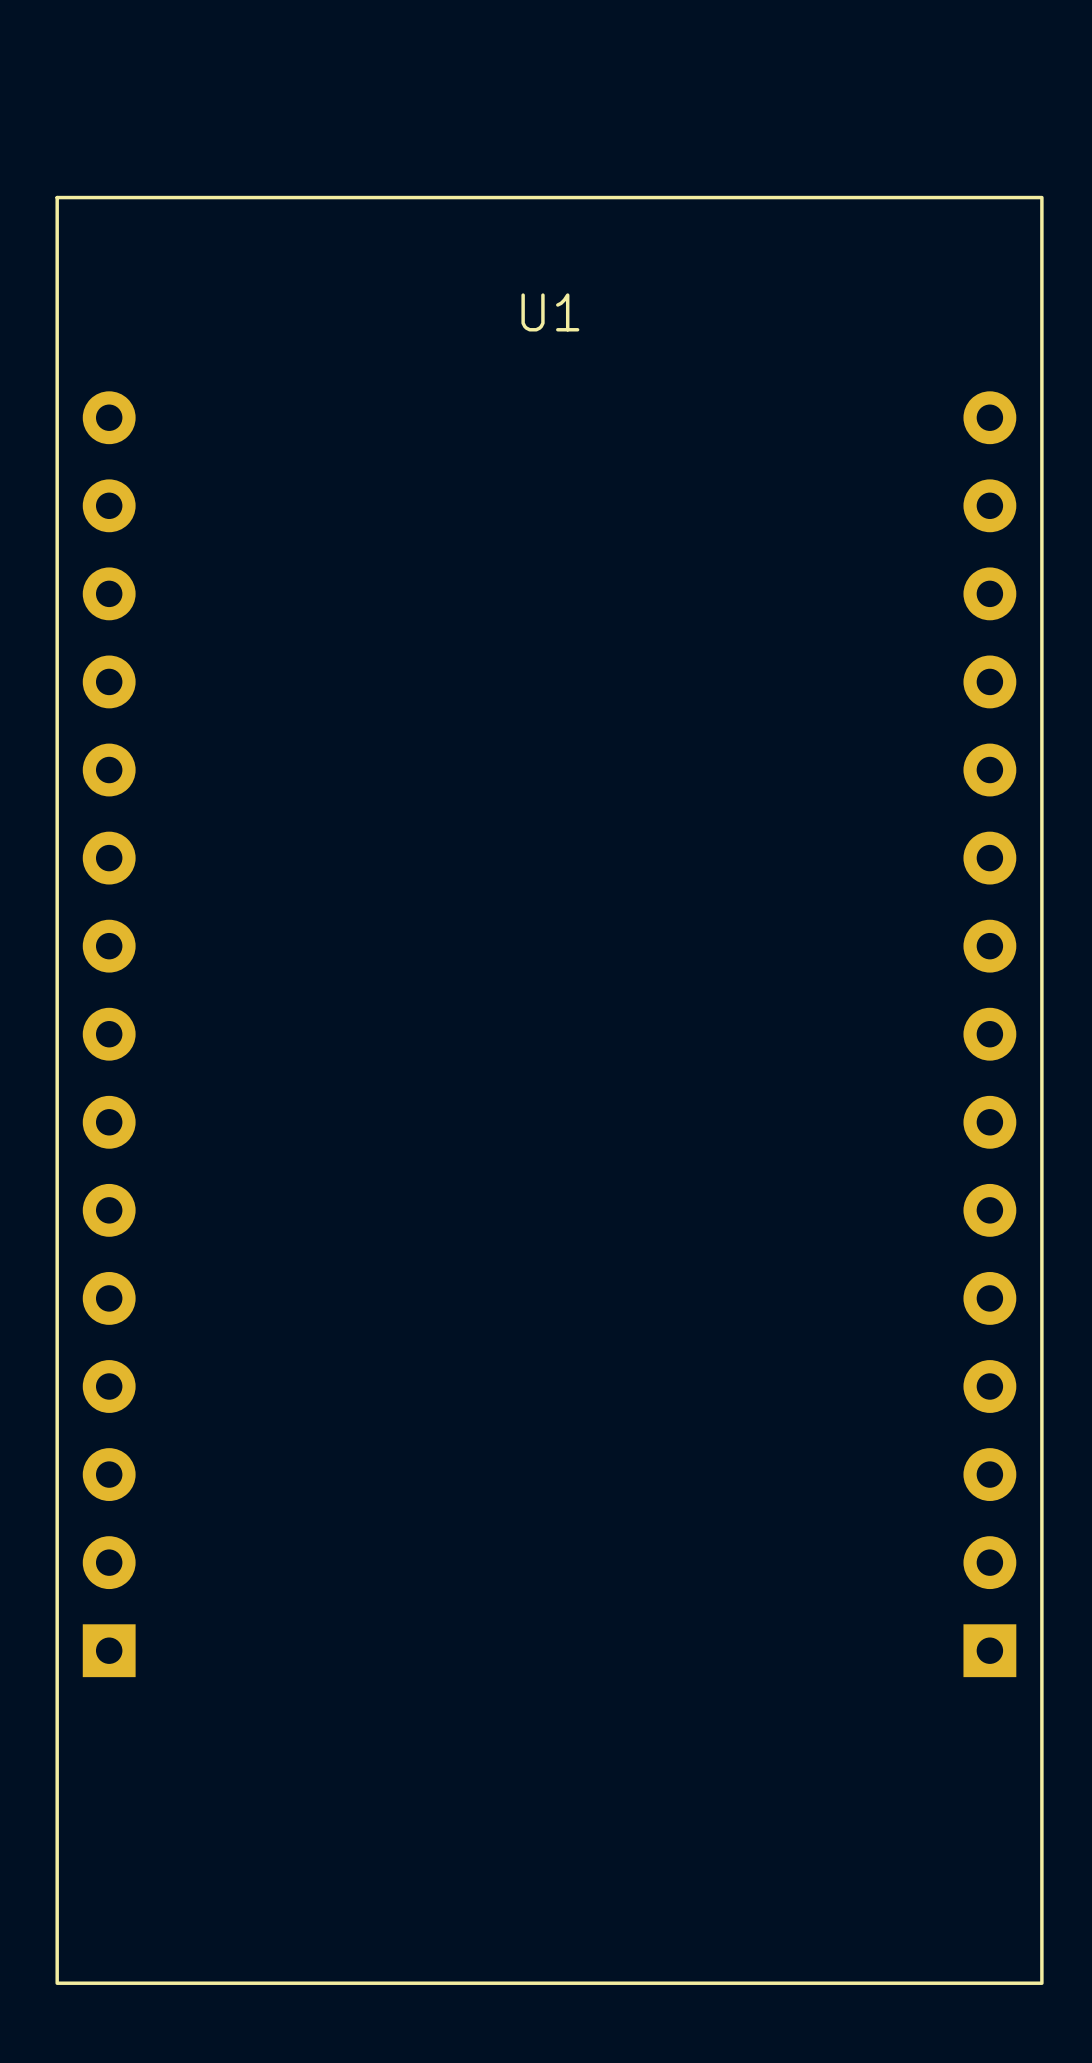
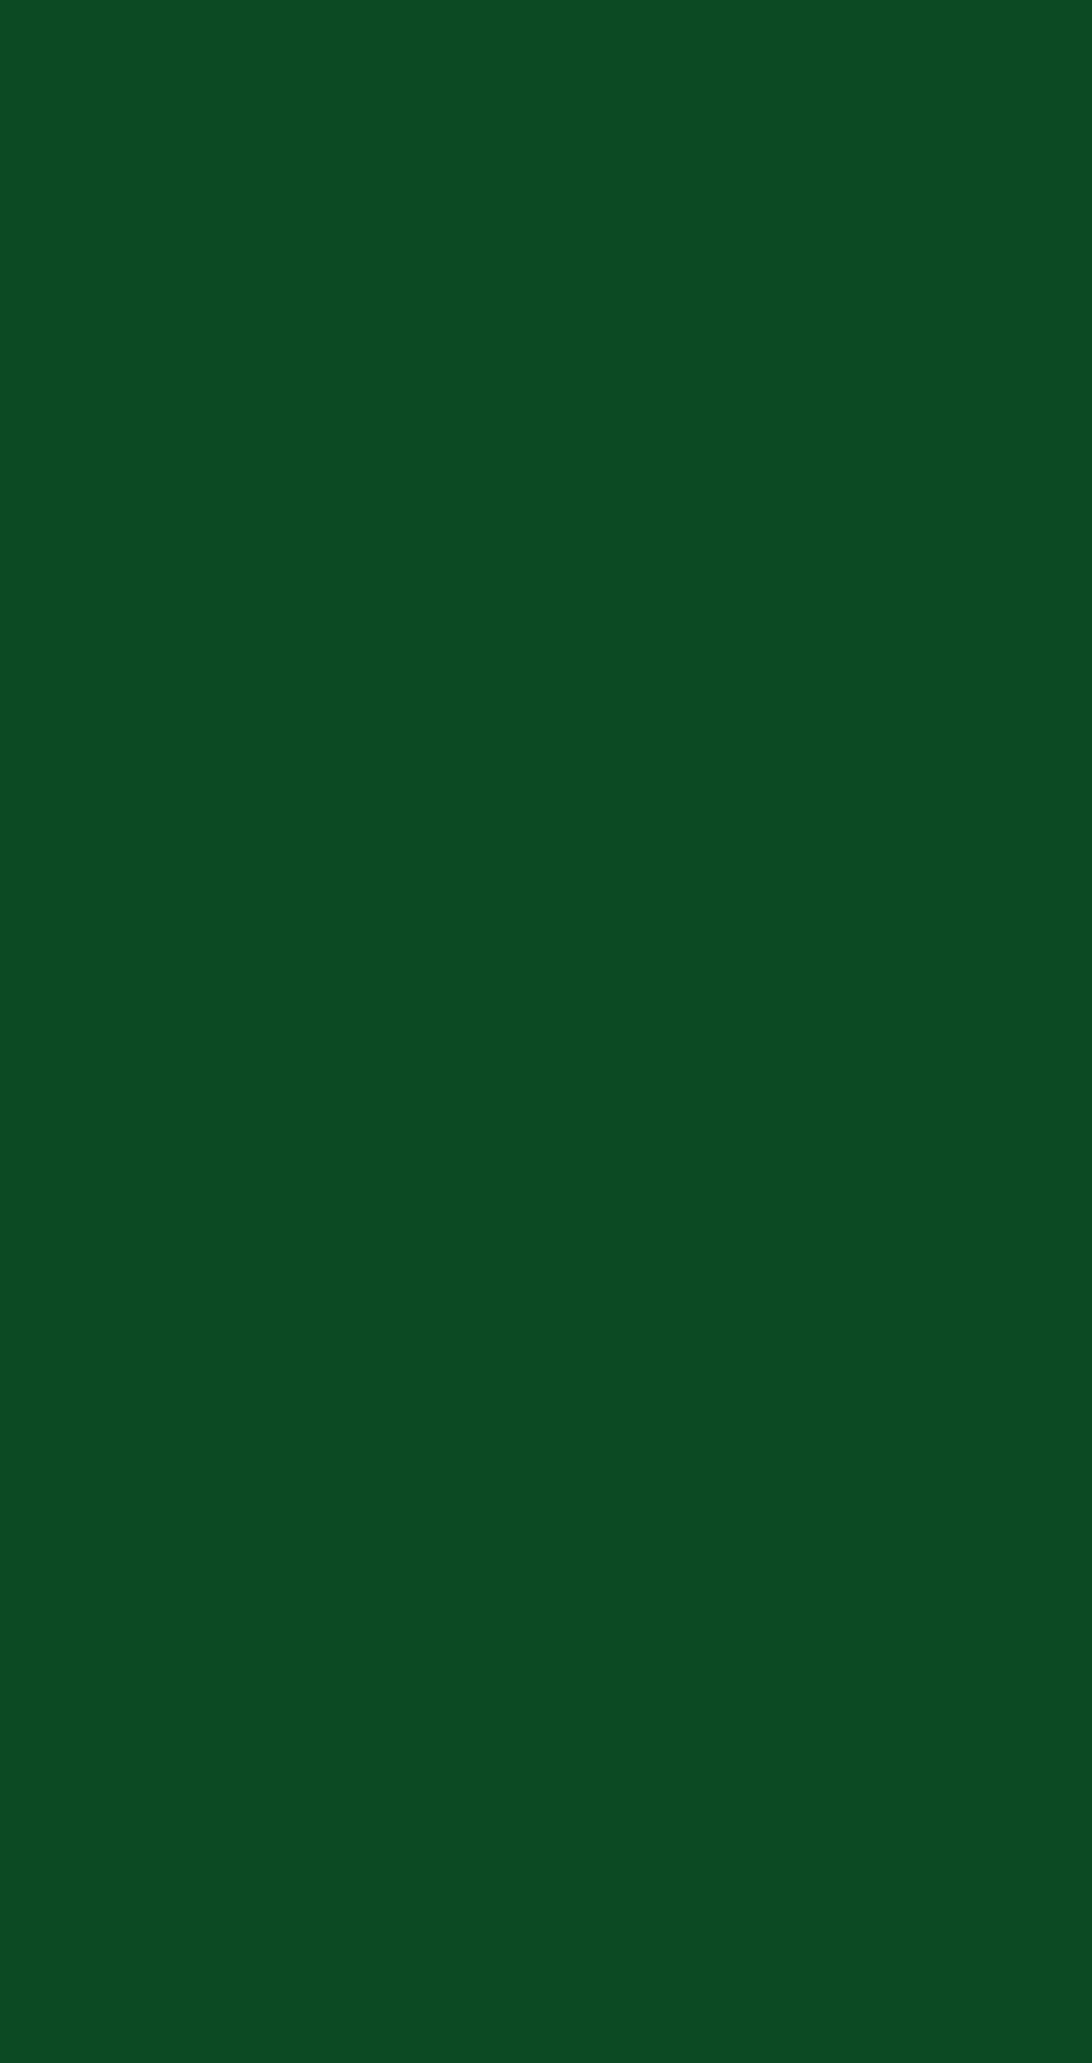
U1: (549, 1090) -> none

